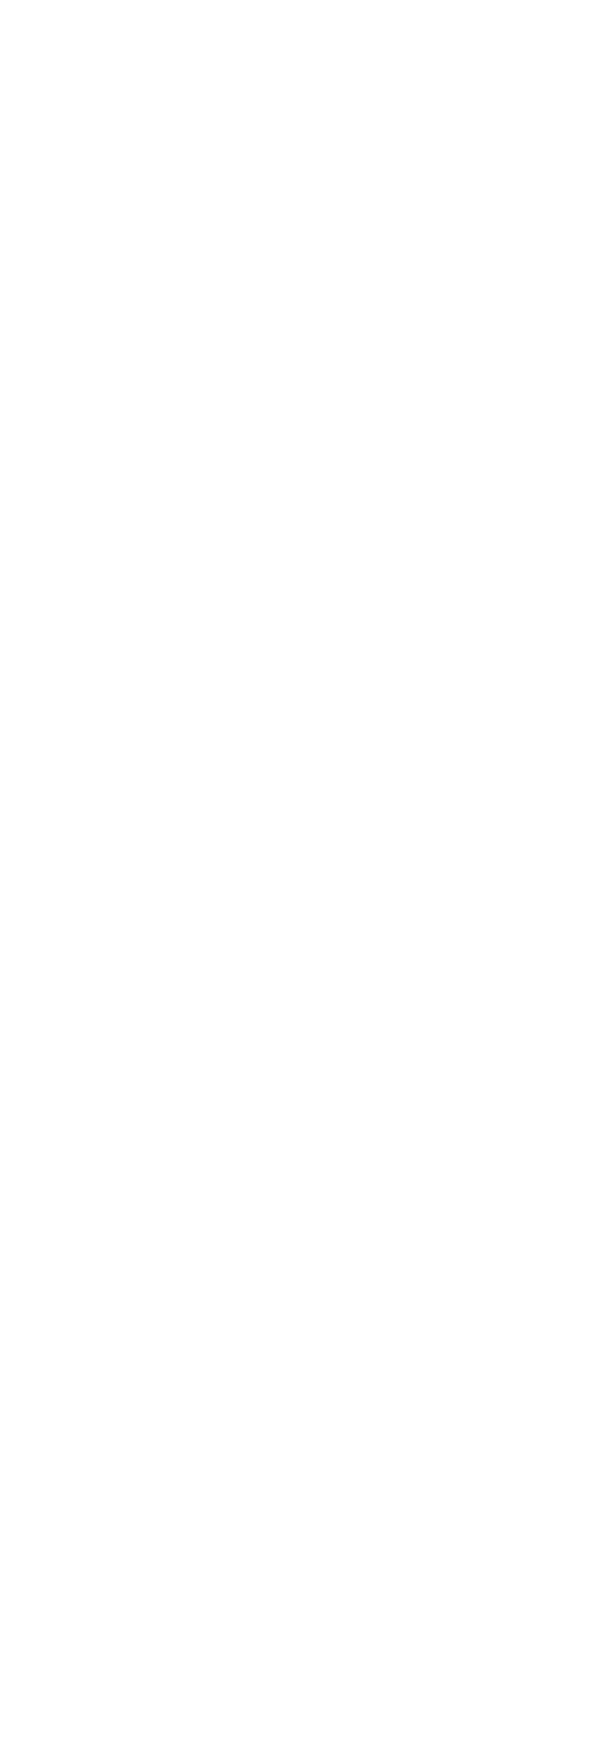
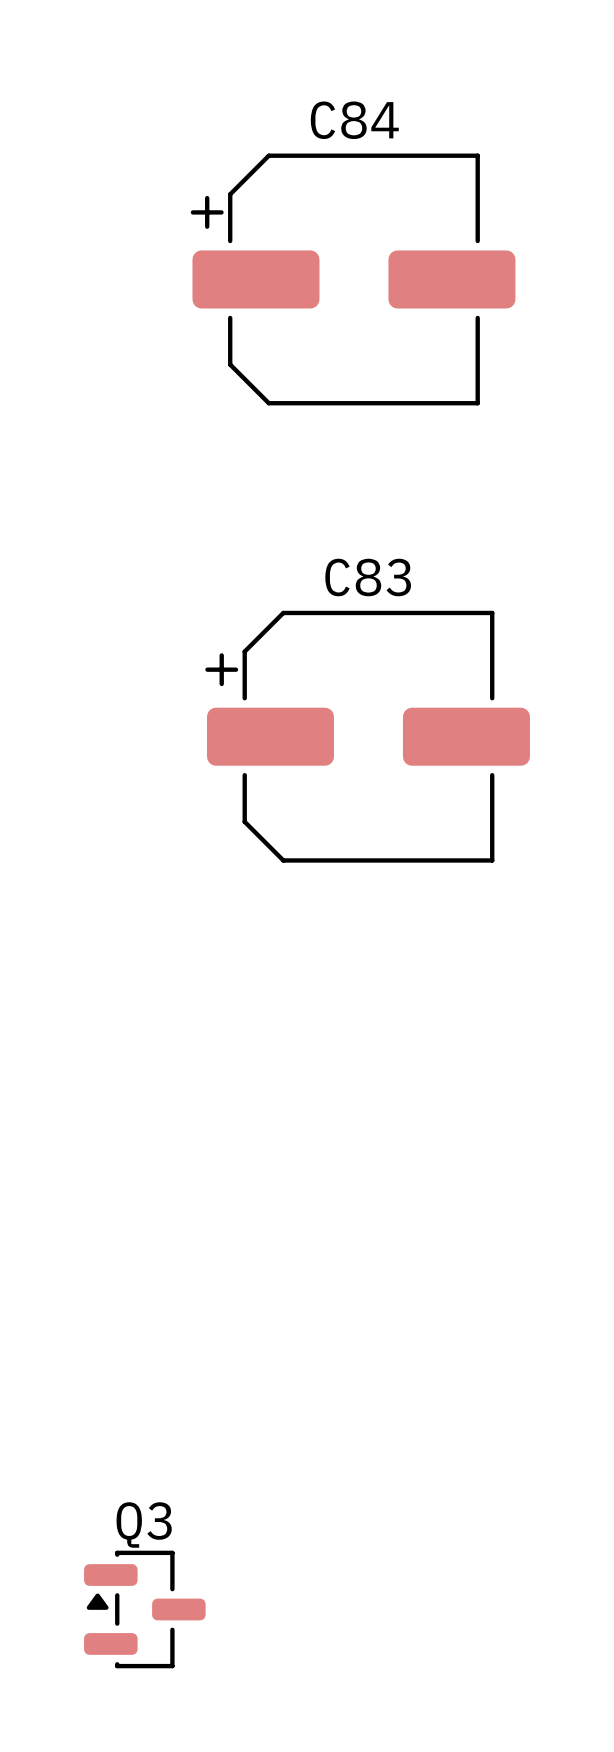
C84: none -> (353, 279)
C83: none -> (367, 736)
Q3: none -> (144, 1609)

